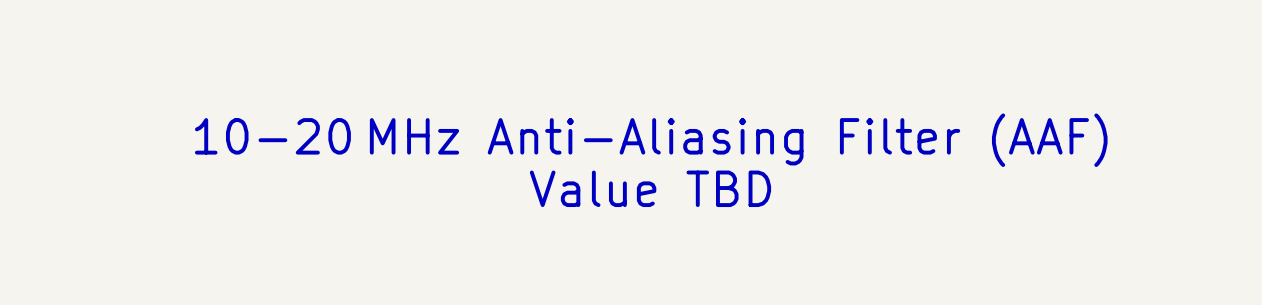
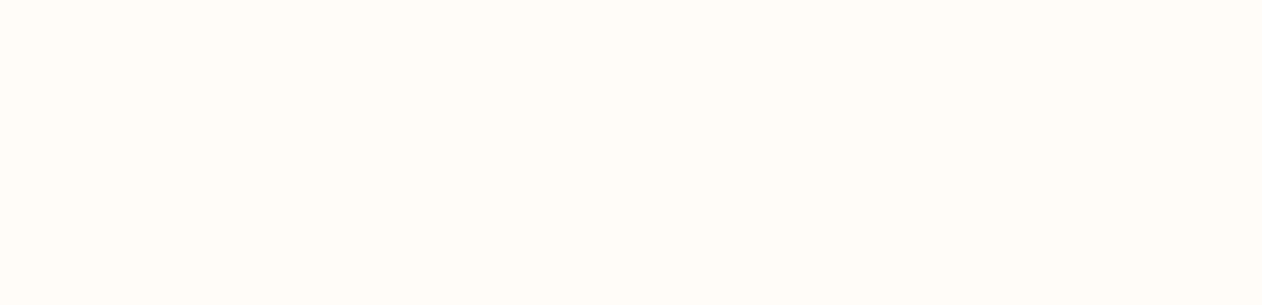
text: 10-20 MHz Anti-Aliasing Filter (AAF) (651, 140) -> none
text: Value TBD (650, 188) -> none

